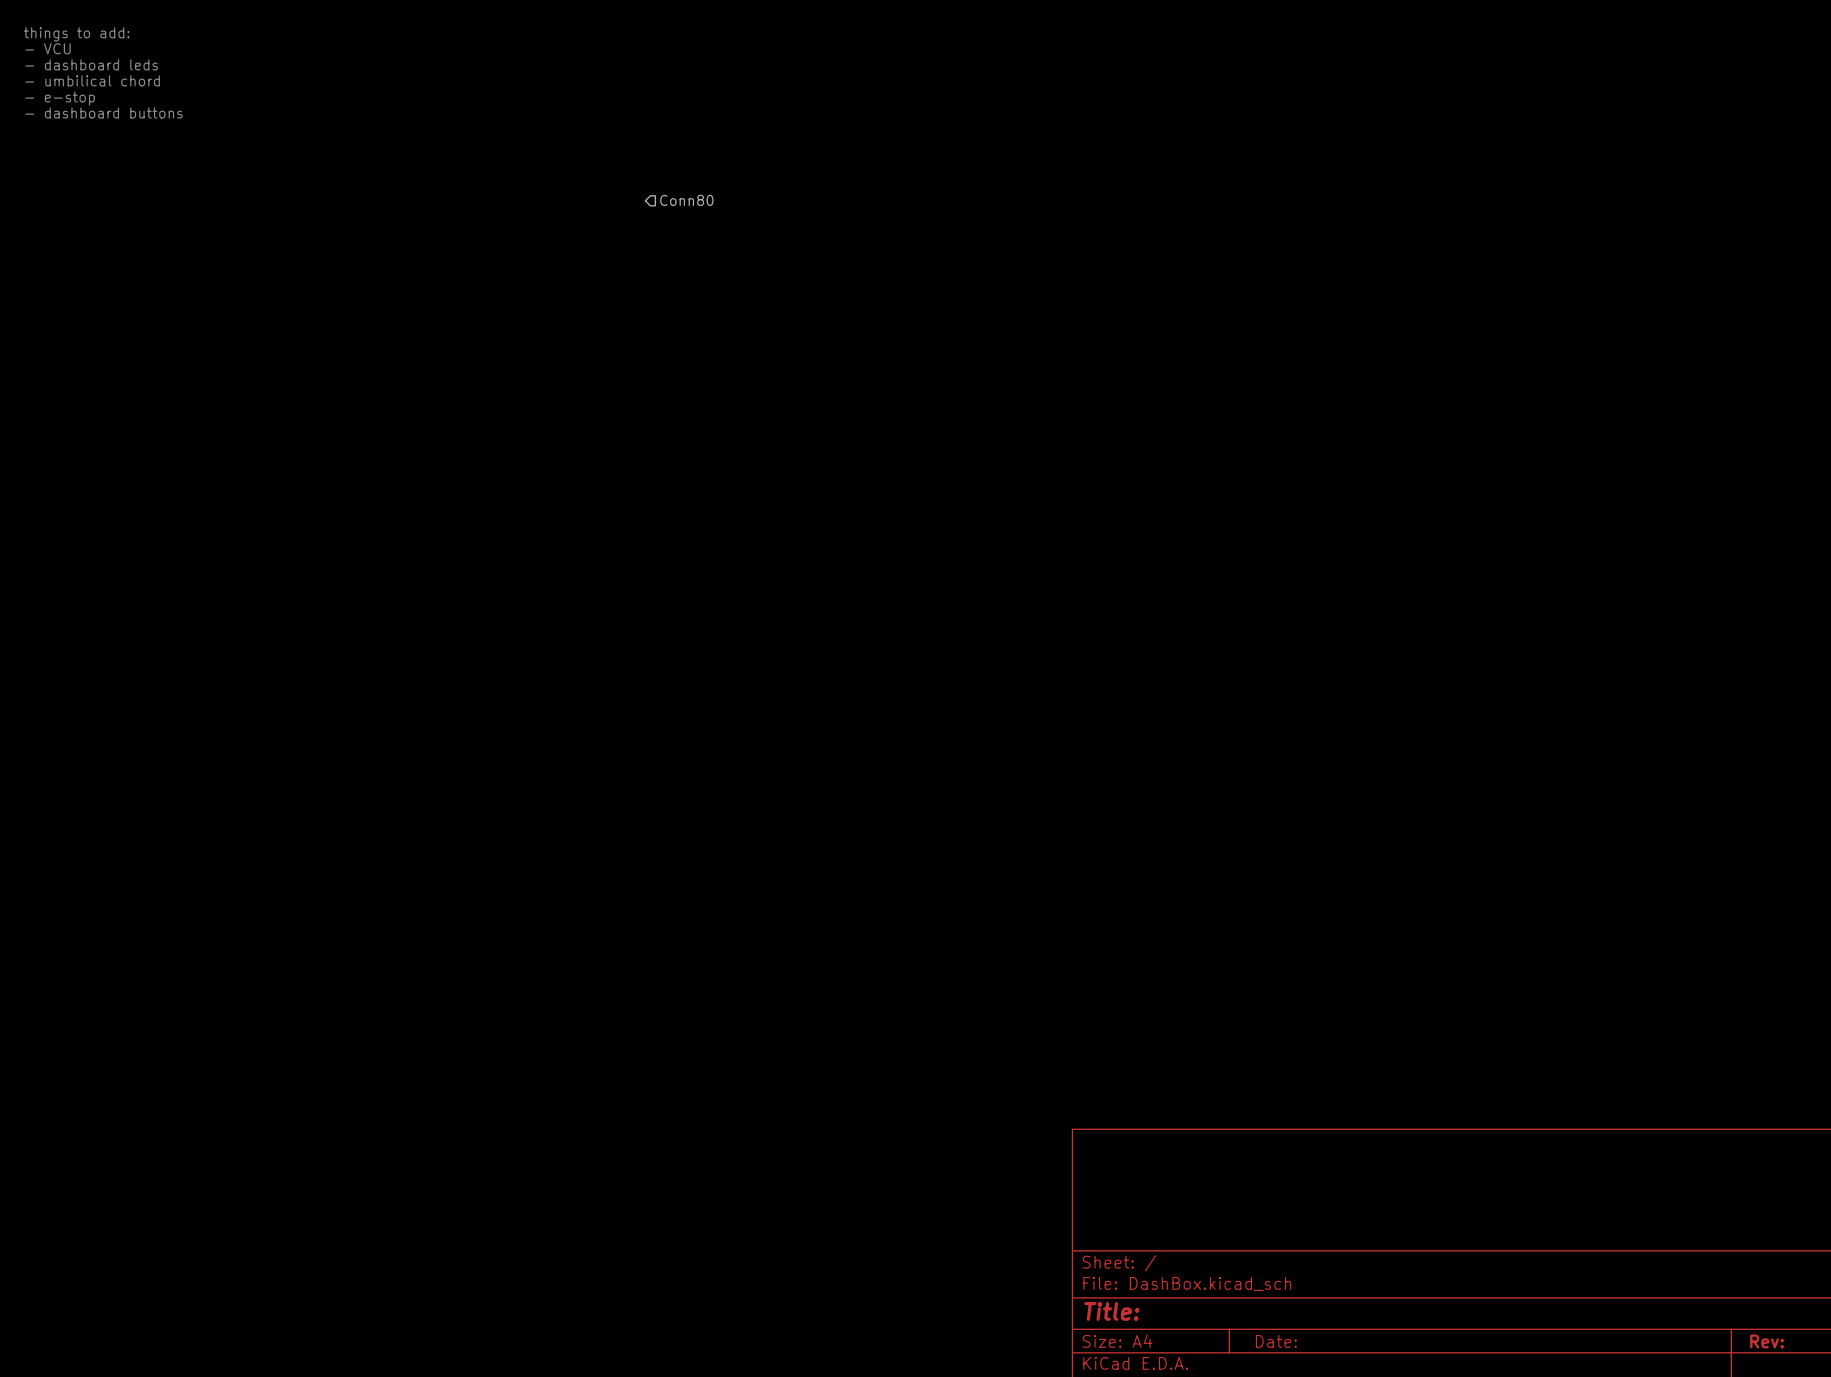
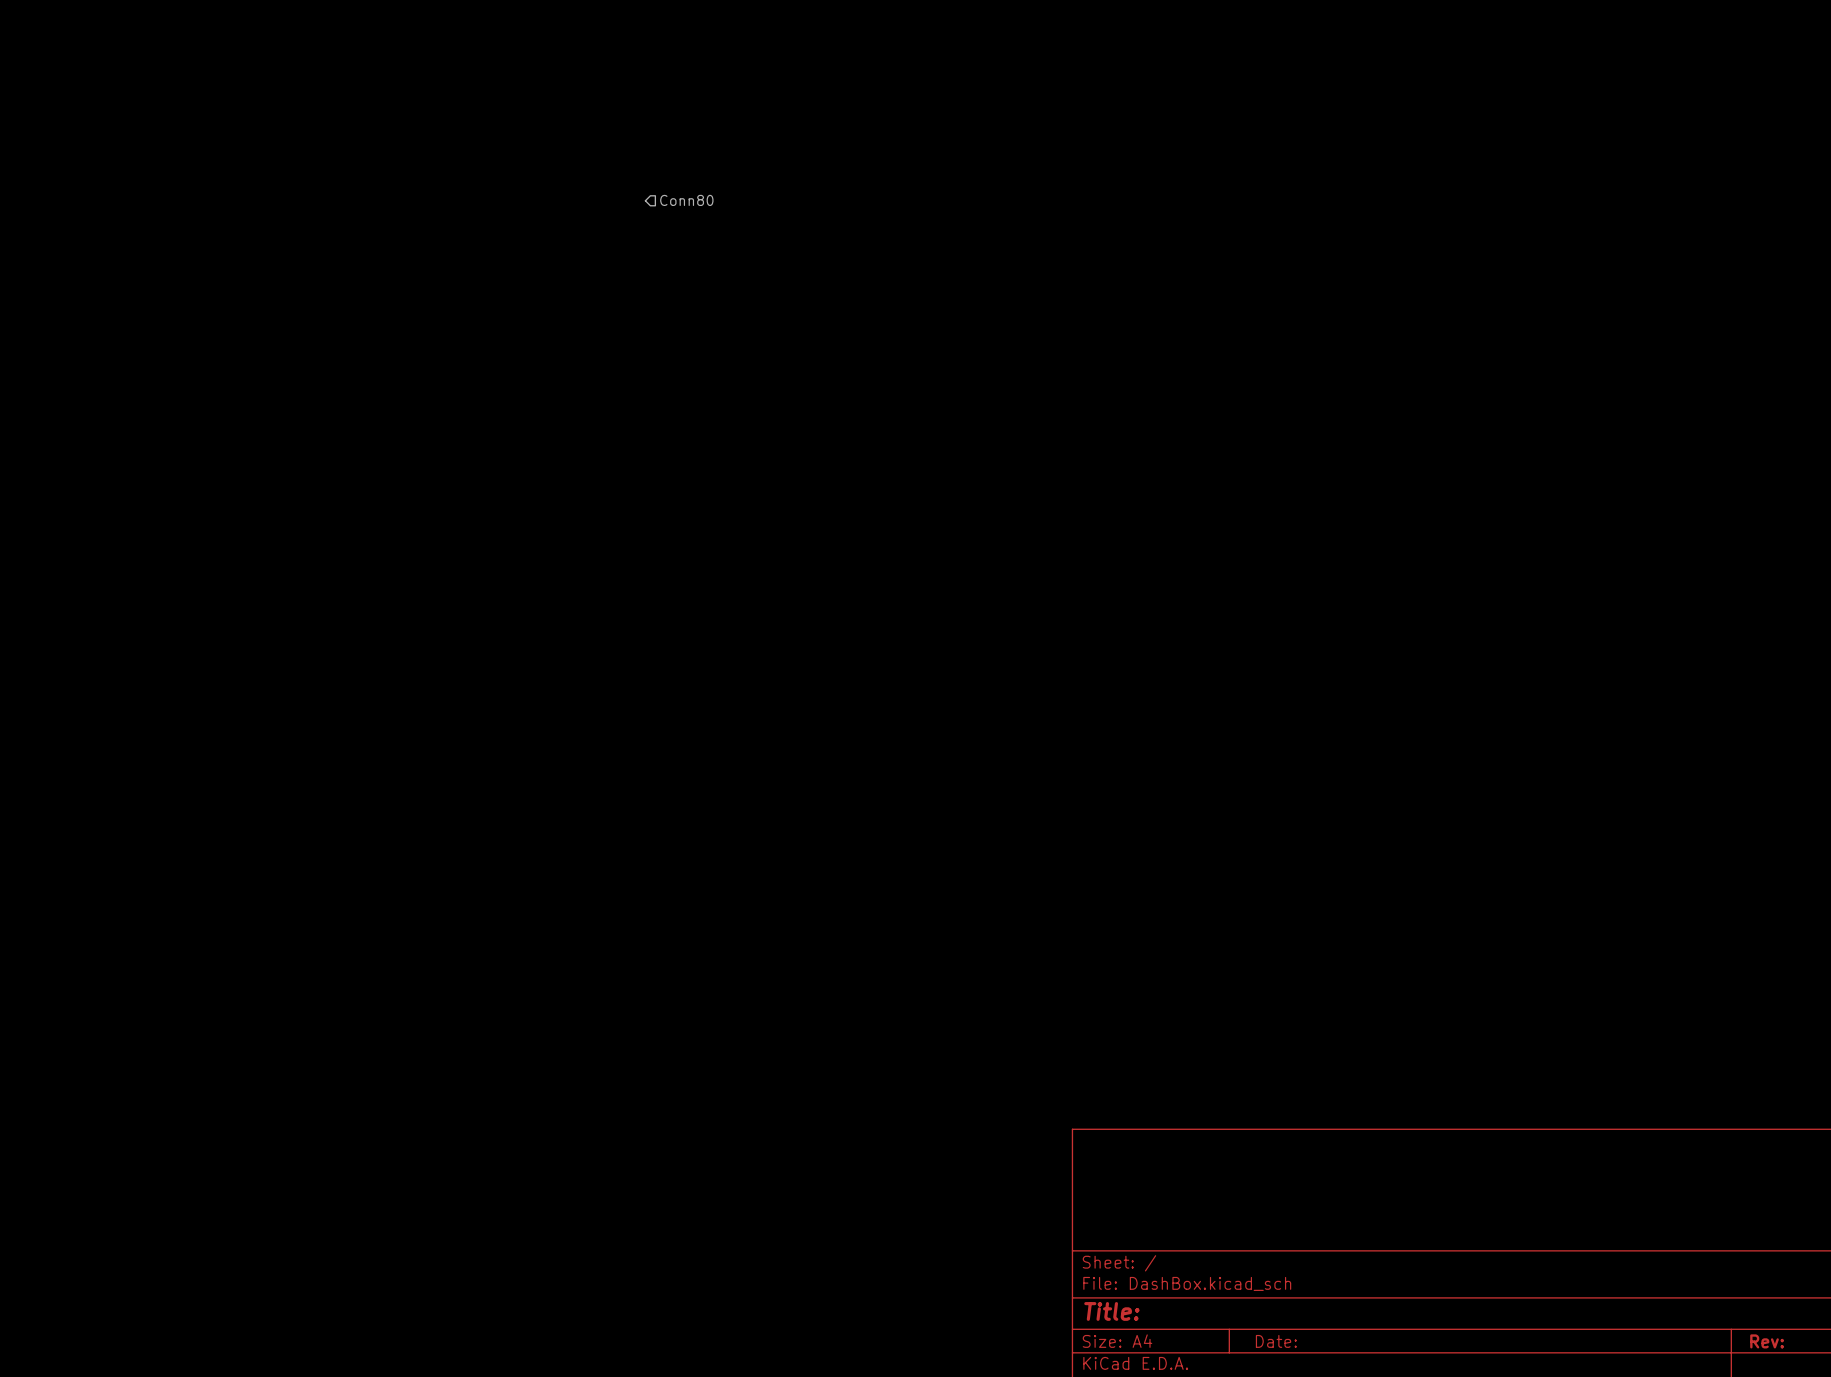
text: things to add: (76, 34) -> none
text: - VCU (48, 48) -> none
text: - dashboard leds (91, 64) -> none
text: - umbilical chord (92, 80) -> none
text: - e-stop (60, 98) -> none
text: - dashboard buttons (104, 112) -> none

